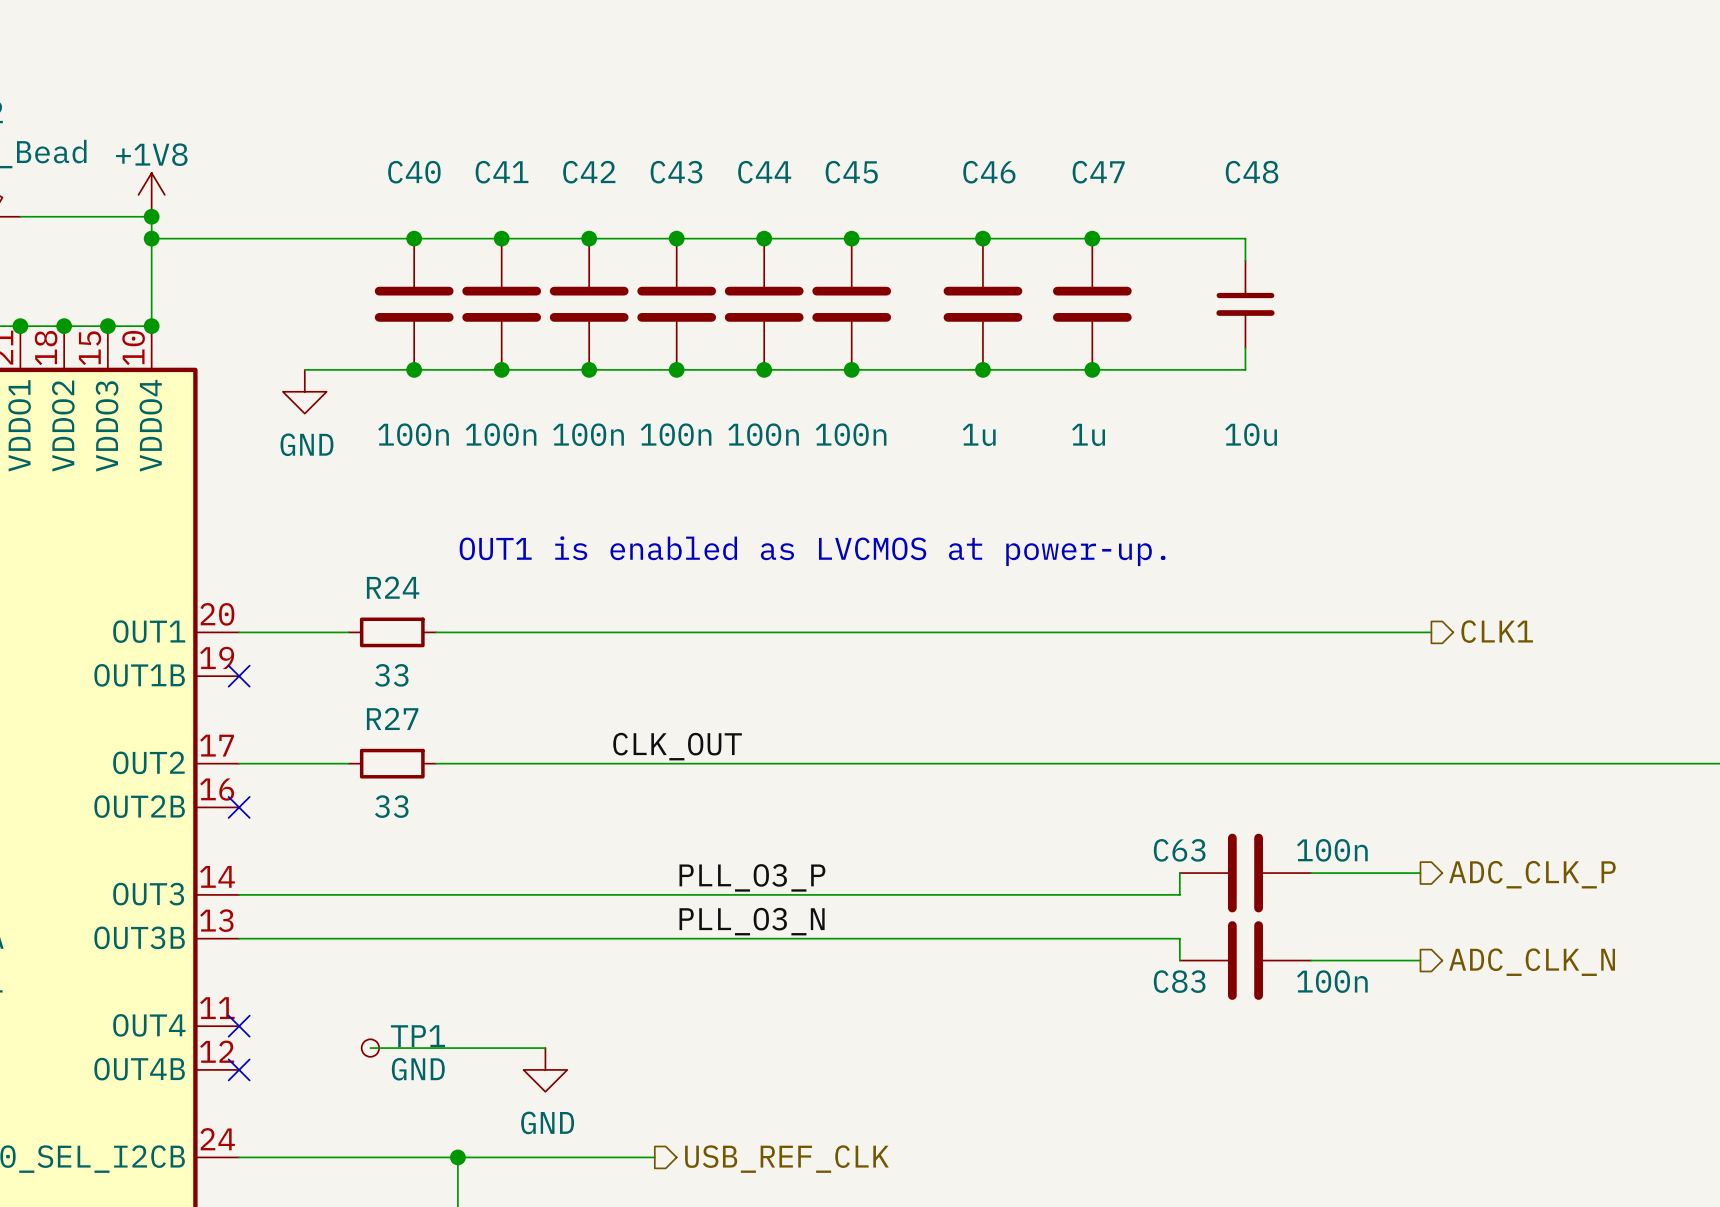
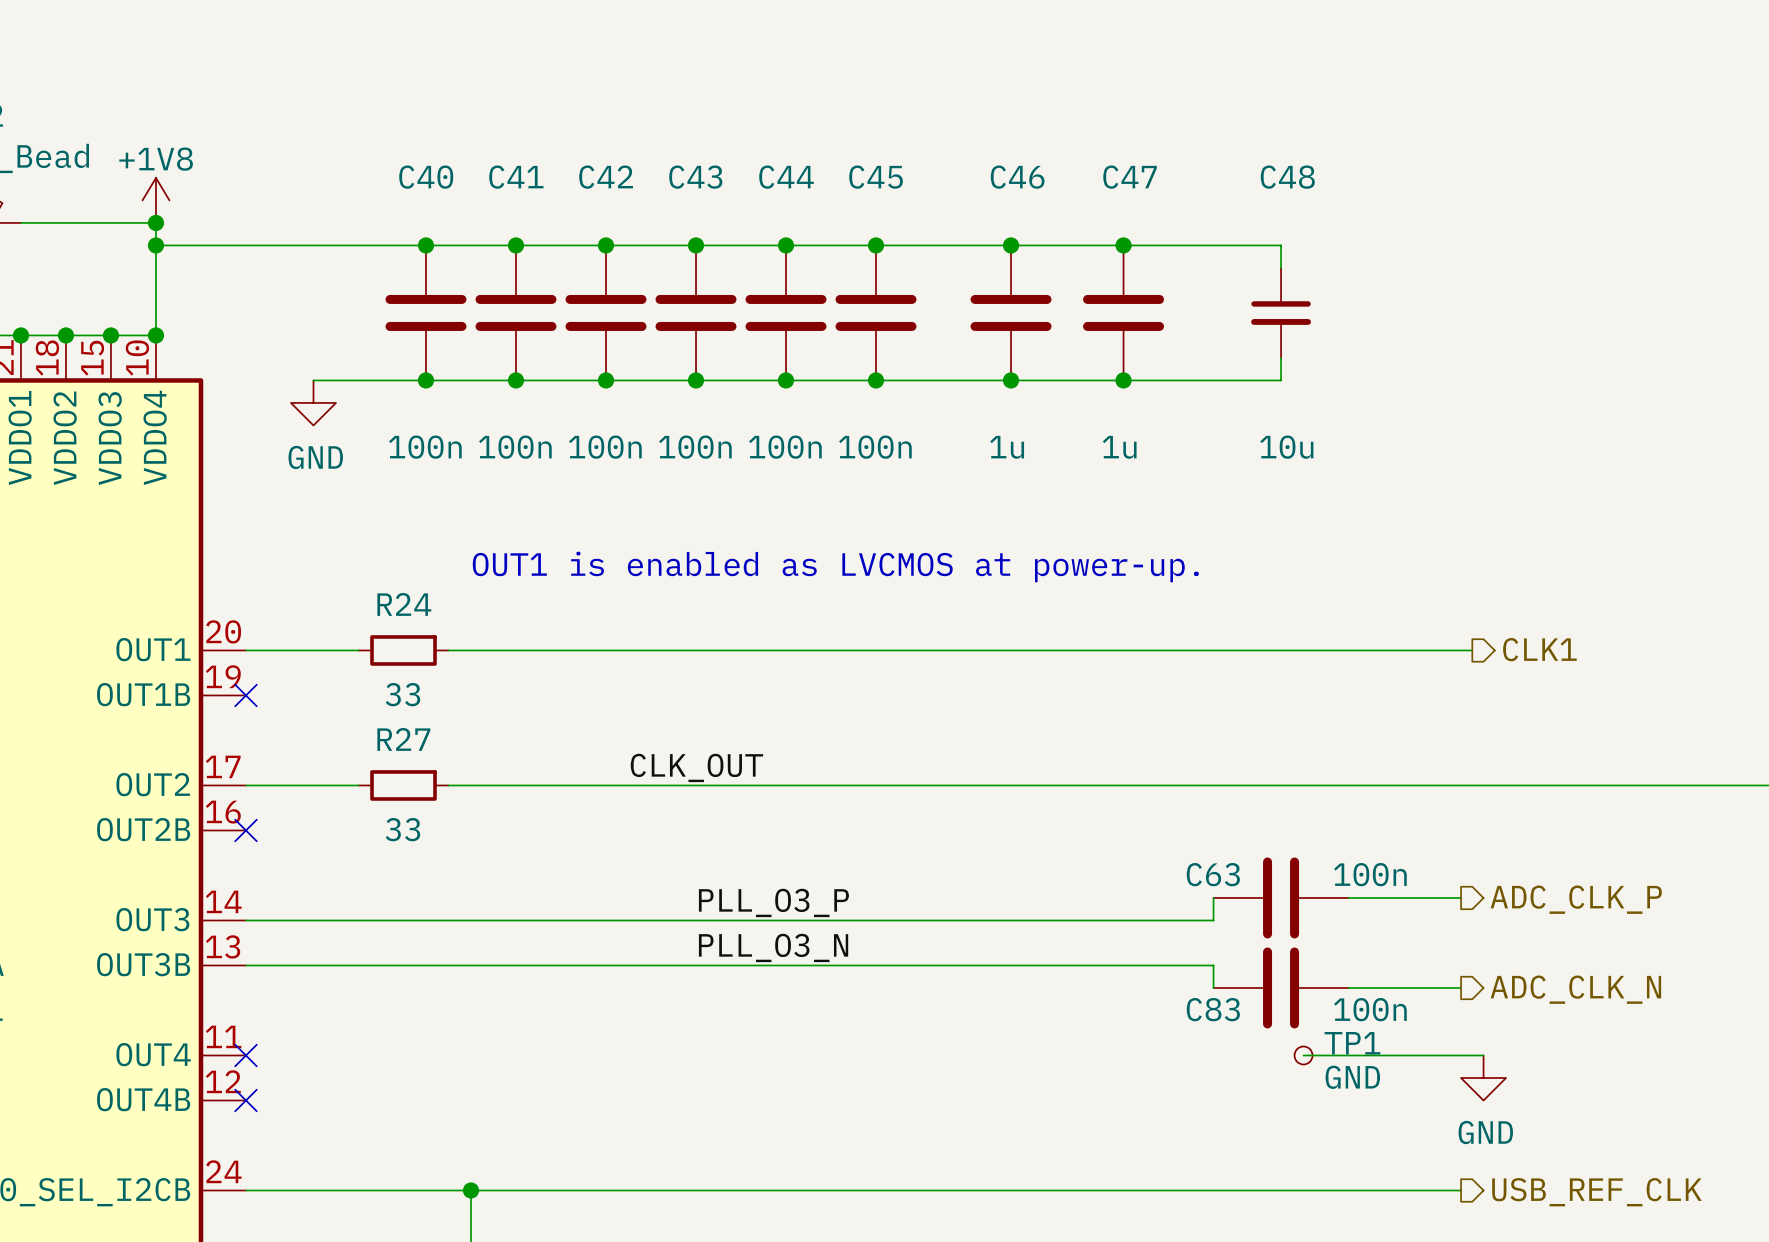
wire: none -> (1303, 1055) (1483, 1055)
wire: (370, 1048) (545, 1048) -> none
TP1 position: (370, 1048) -> (1303, 1055)
power symbol: none -> GND (1483, 1077)
power symbol: GND (545, 1069) -> none
wire: none -> (673, 1190) (1461, 1190)
hierarchical label: USB_REF_CLK (786, 1159) -> none
hierarchical label: none -> USB_REF_CLK (1596, 1192)

